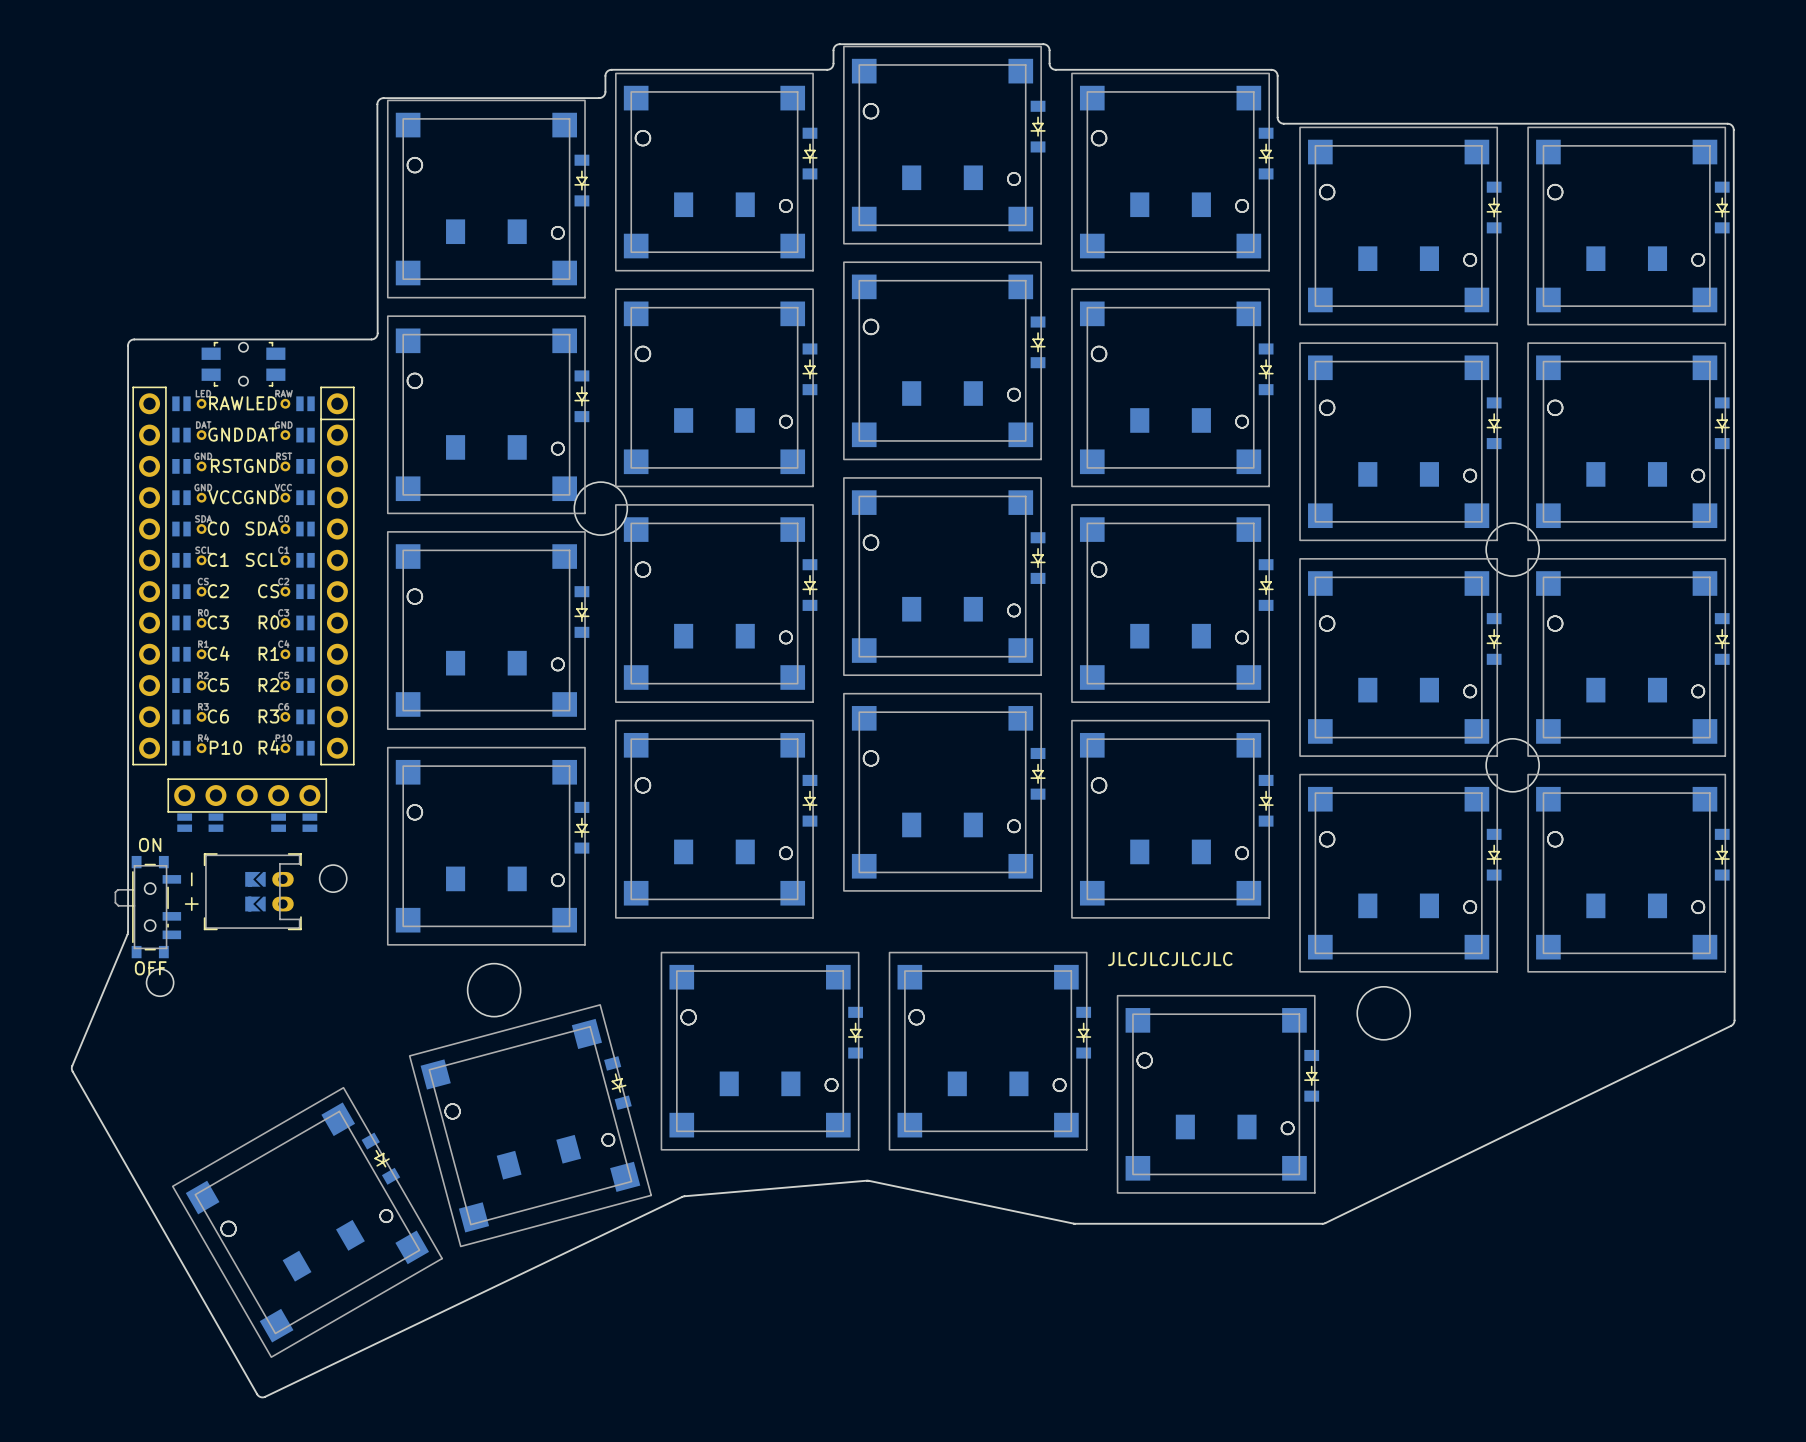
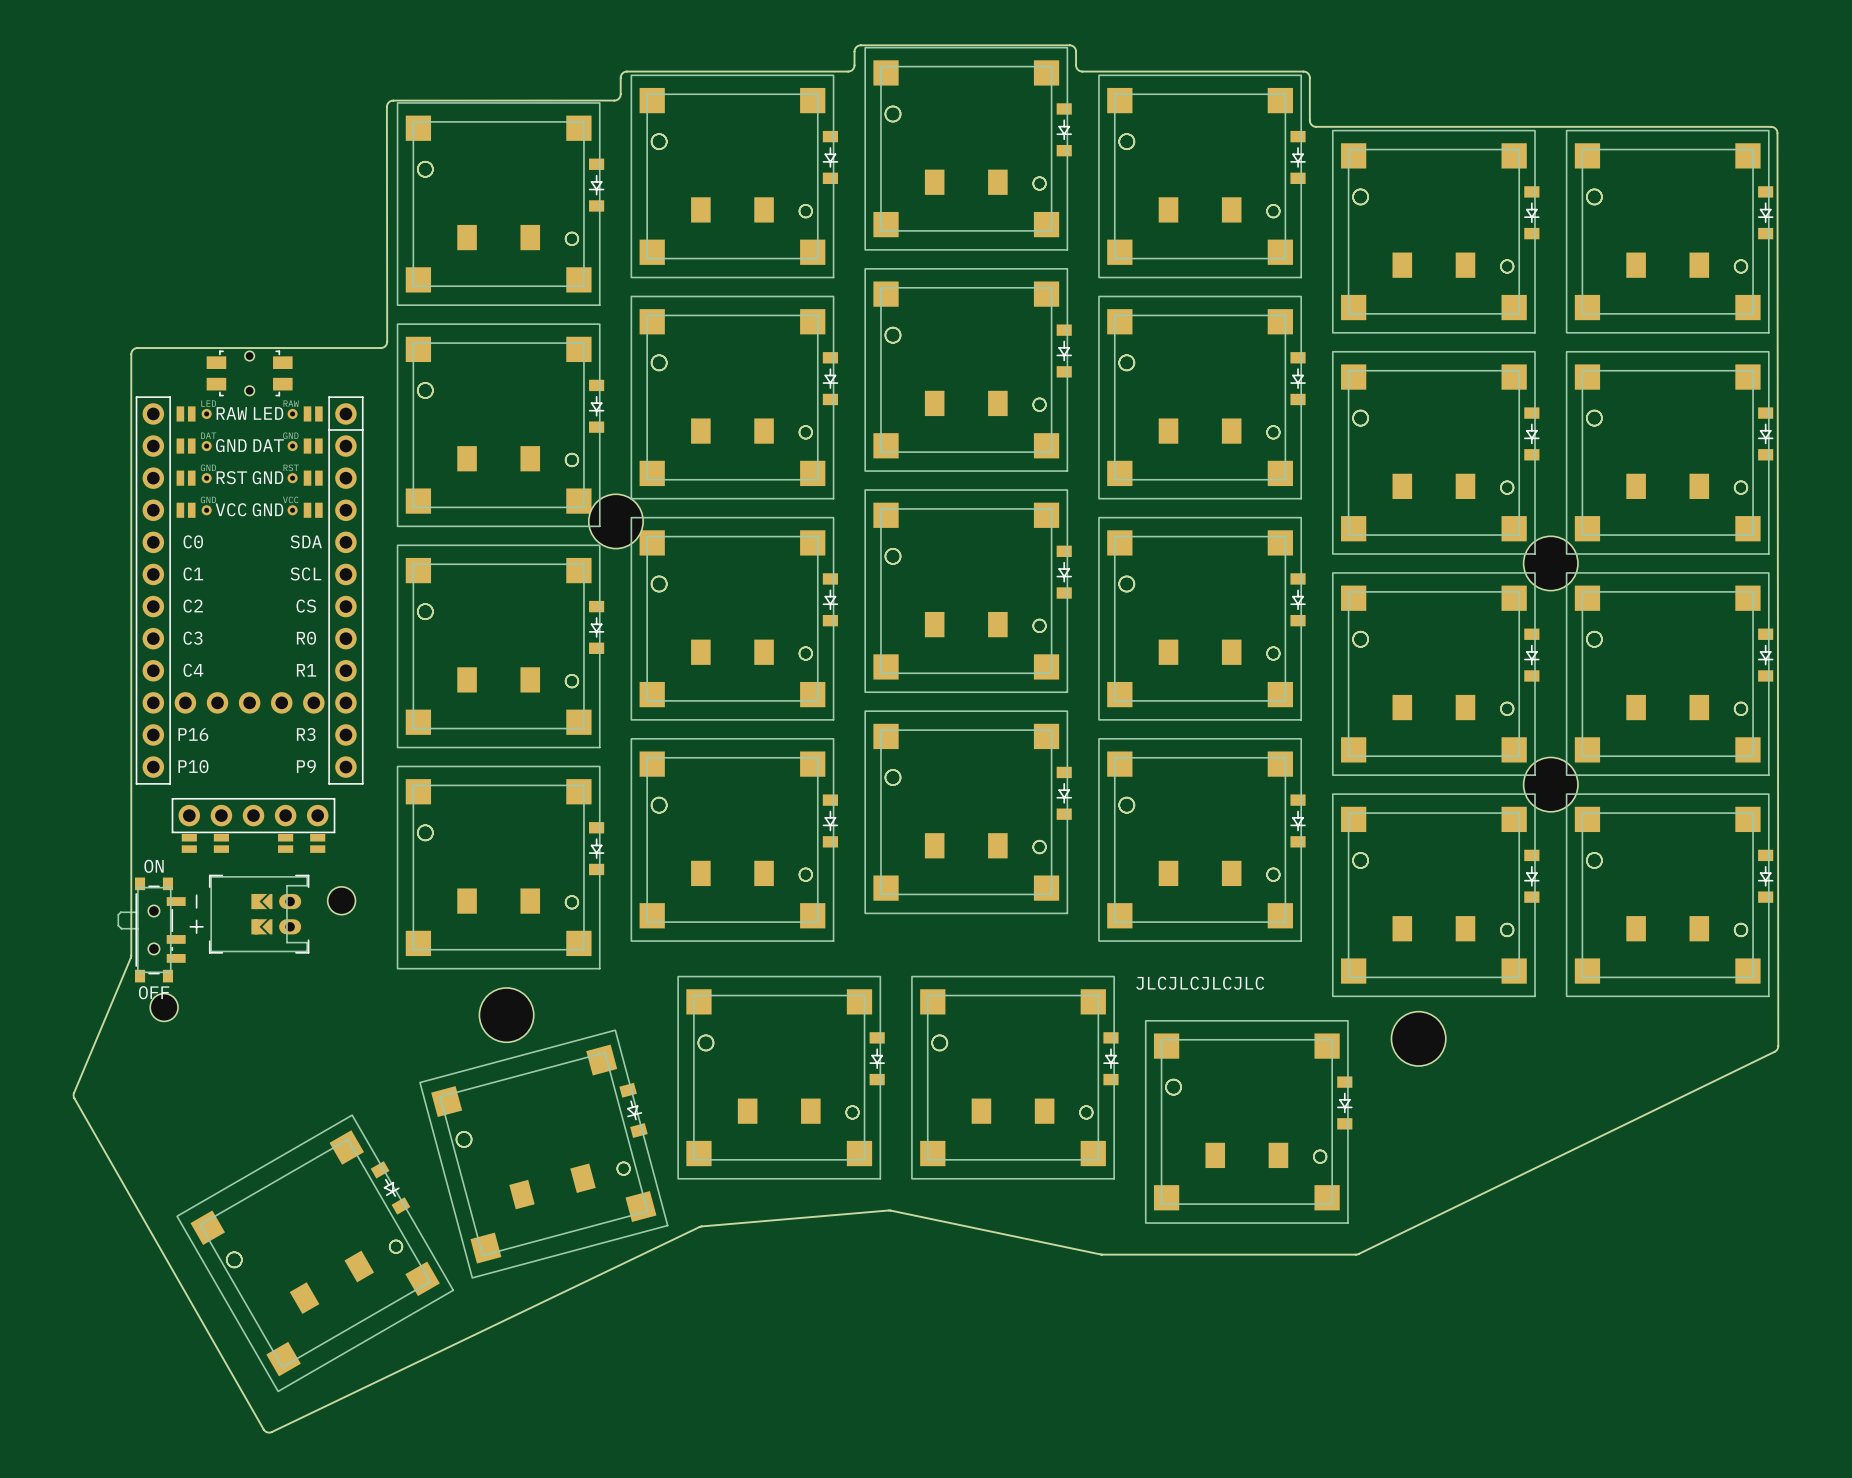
part footprint: [132, 386, 355, 766] -> [135, 396, 364, 785]

